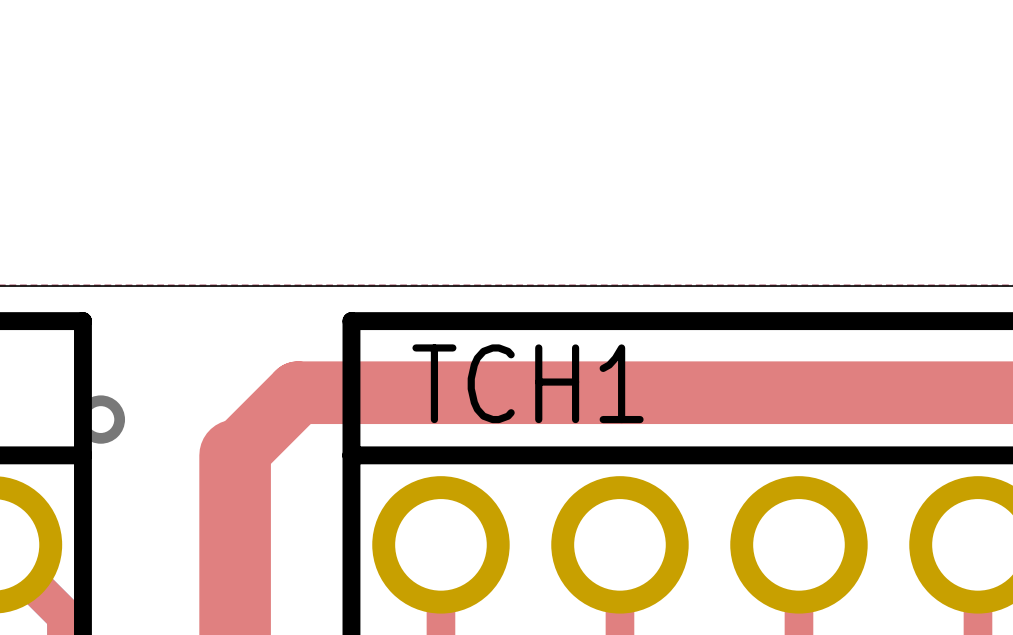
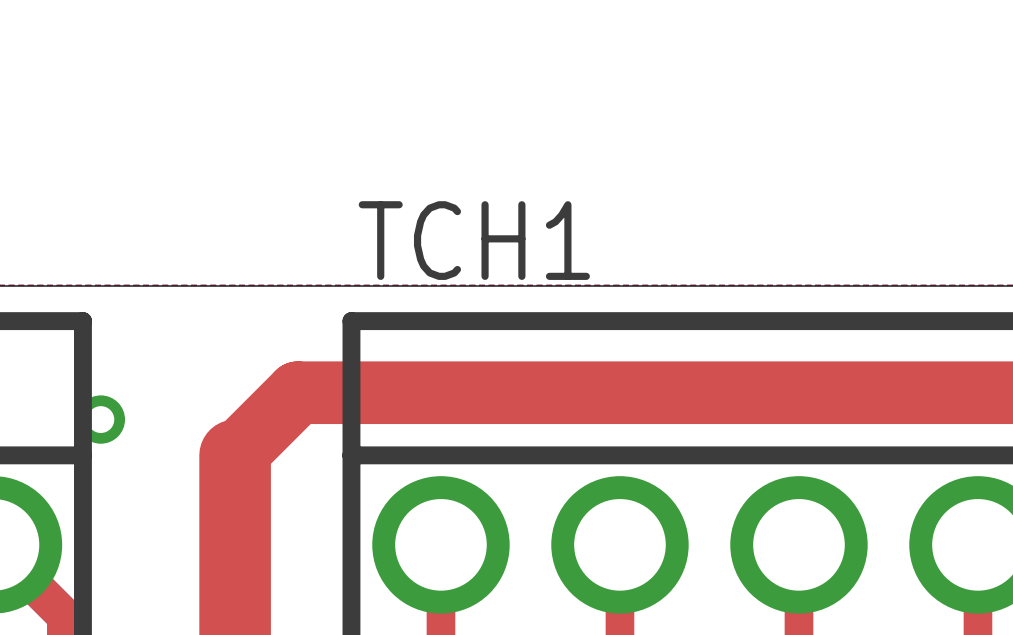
TCH1 name position: TCH1 (528, 383) -> TCH1 (474, 240)

